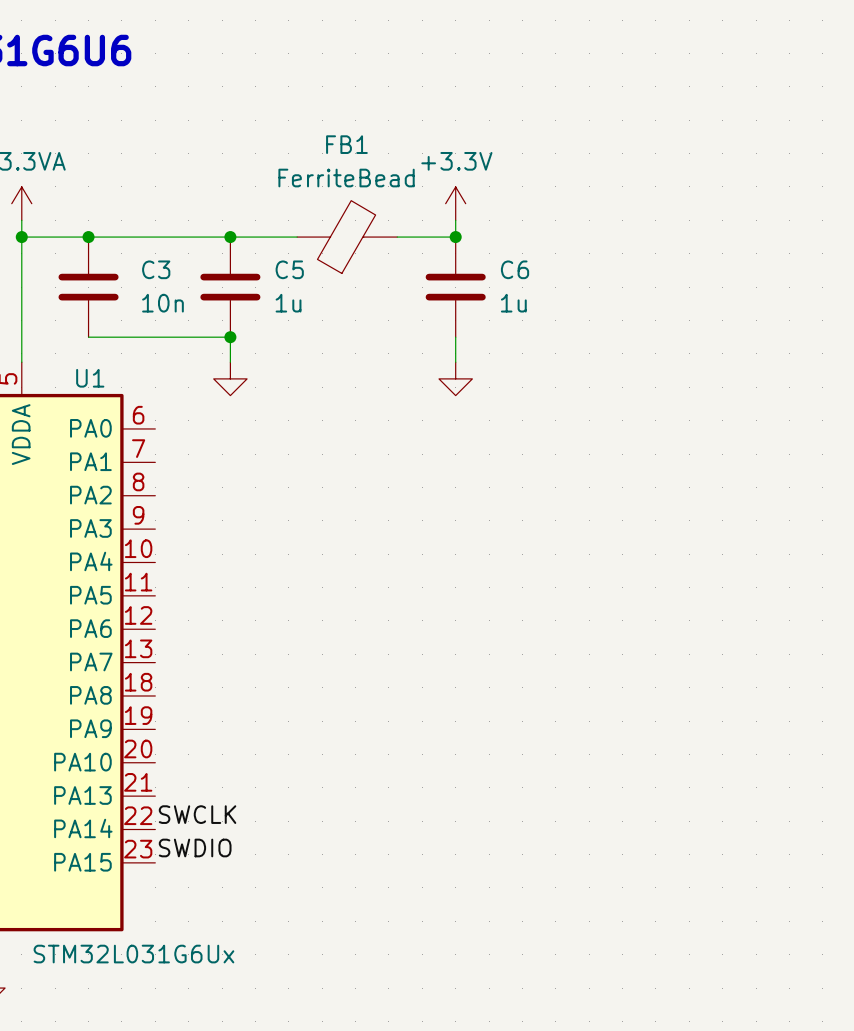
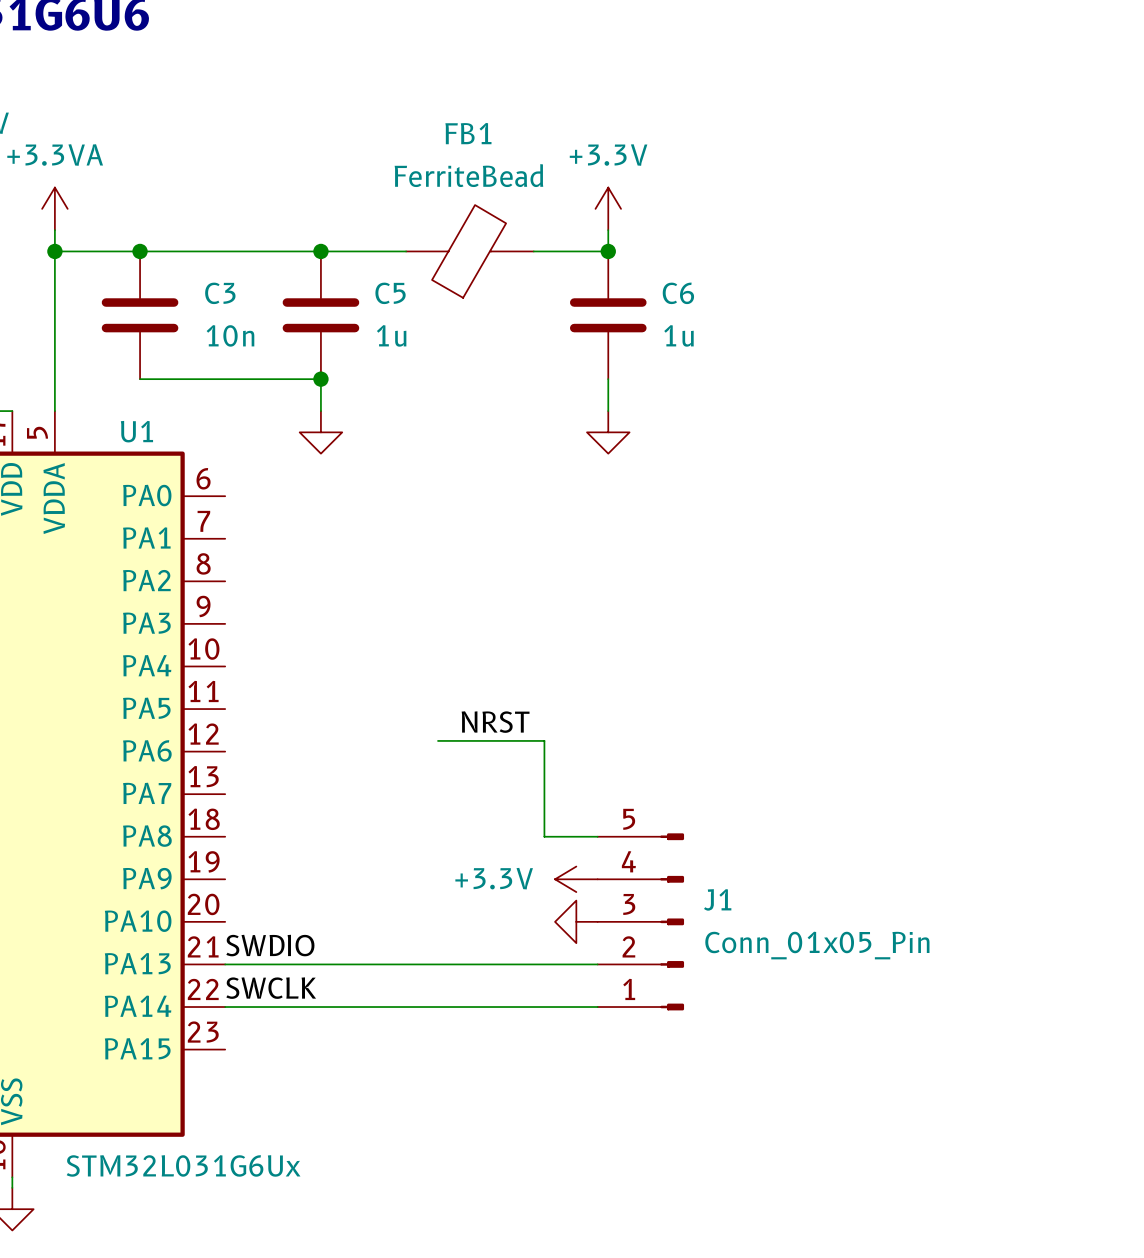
label: none -> NRST (495, 722)
wire: none -> (438, 740) (544, 740) (544, 836) (597, 836)
power symbol: none -> +3.3V (576, 879)
power symbol: none -> (576, 921)
J1: none -> Conn_01x05_Pin (640, 921)
wire: none -> (225, 964) (597, 964)
wire: none -> (225, 1007) (597, 1007)
label position: SWDIO (195, 847) -> SWDIO (270, 945)

